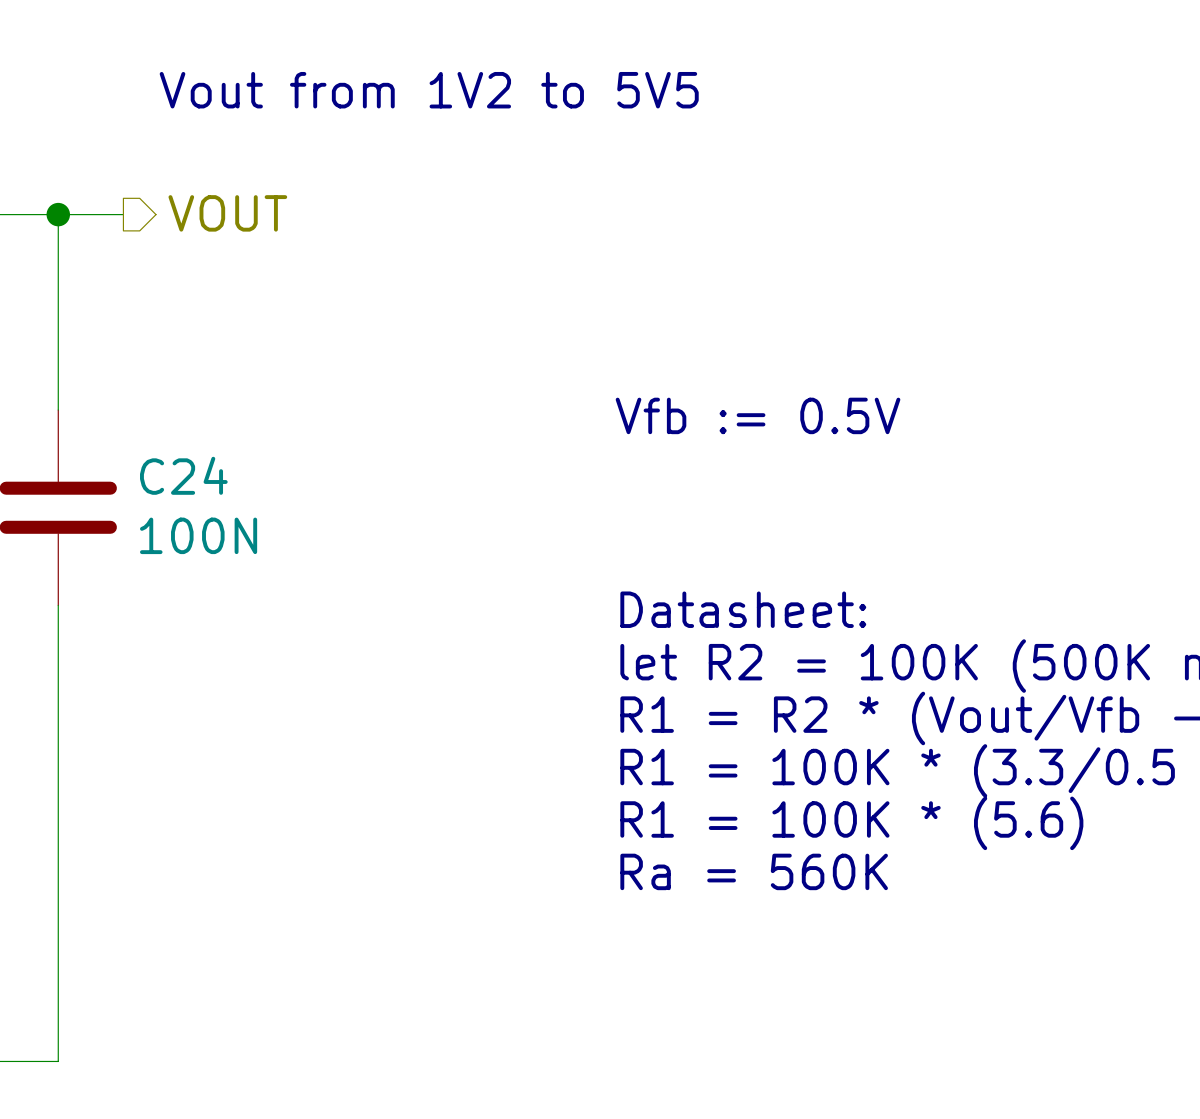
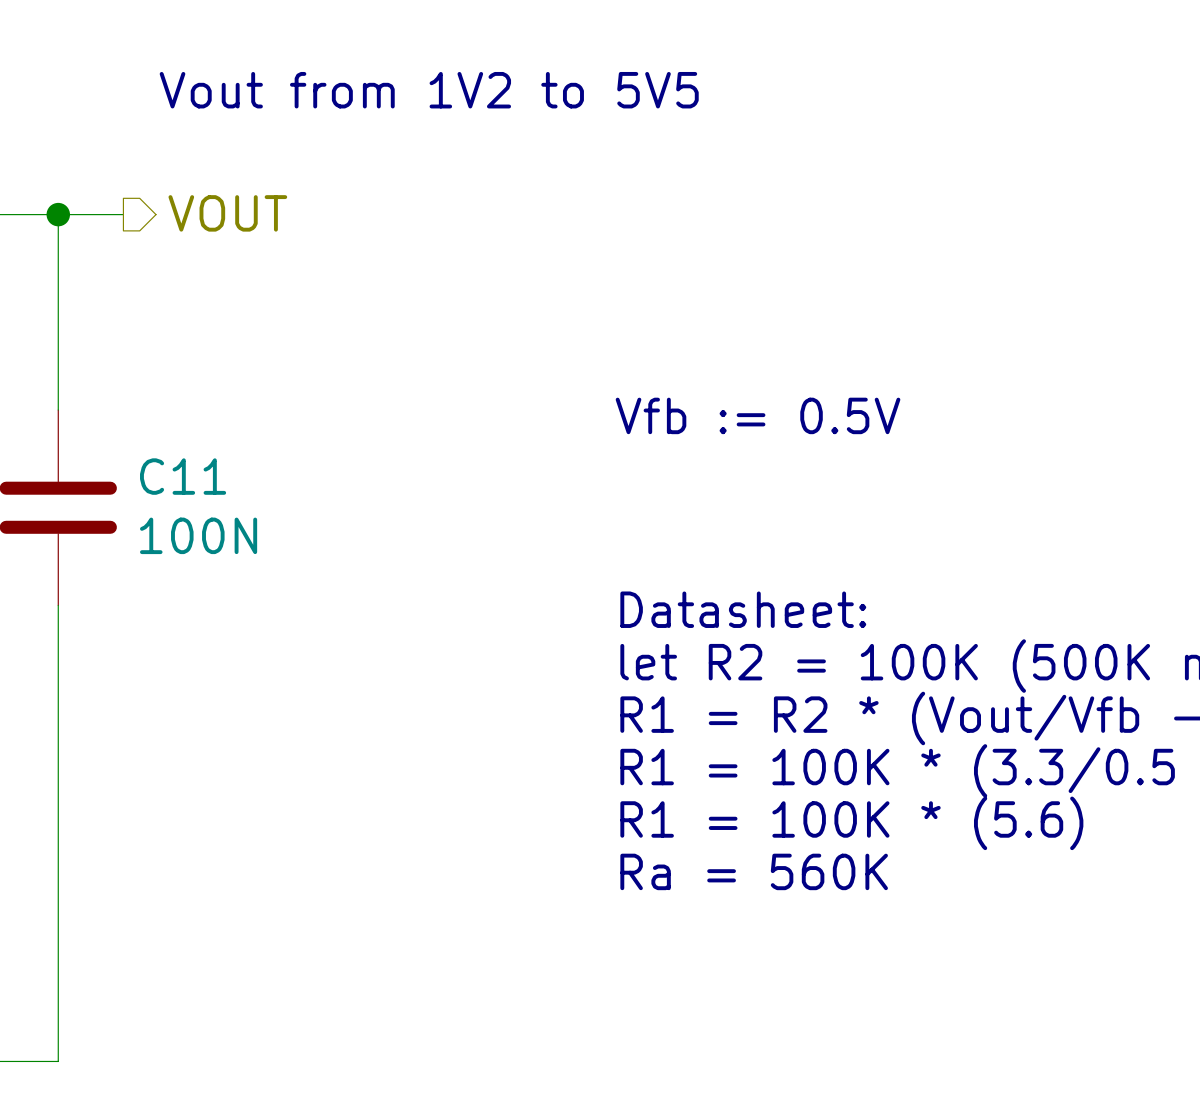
C24 name: C24 (183, 475) -> C11 (183, 476)

